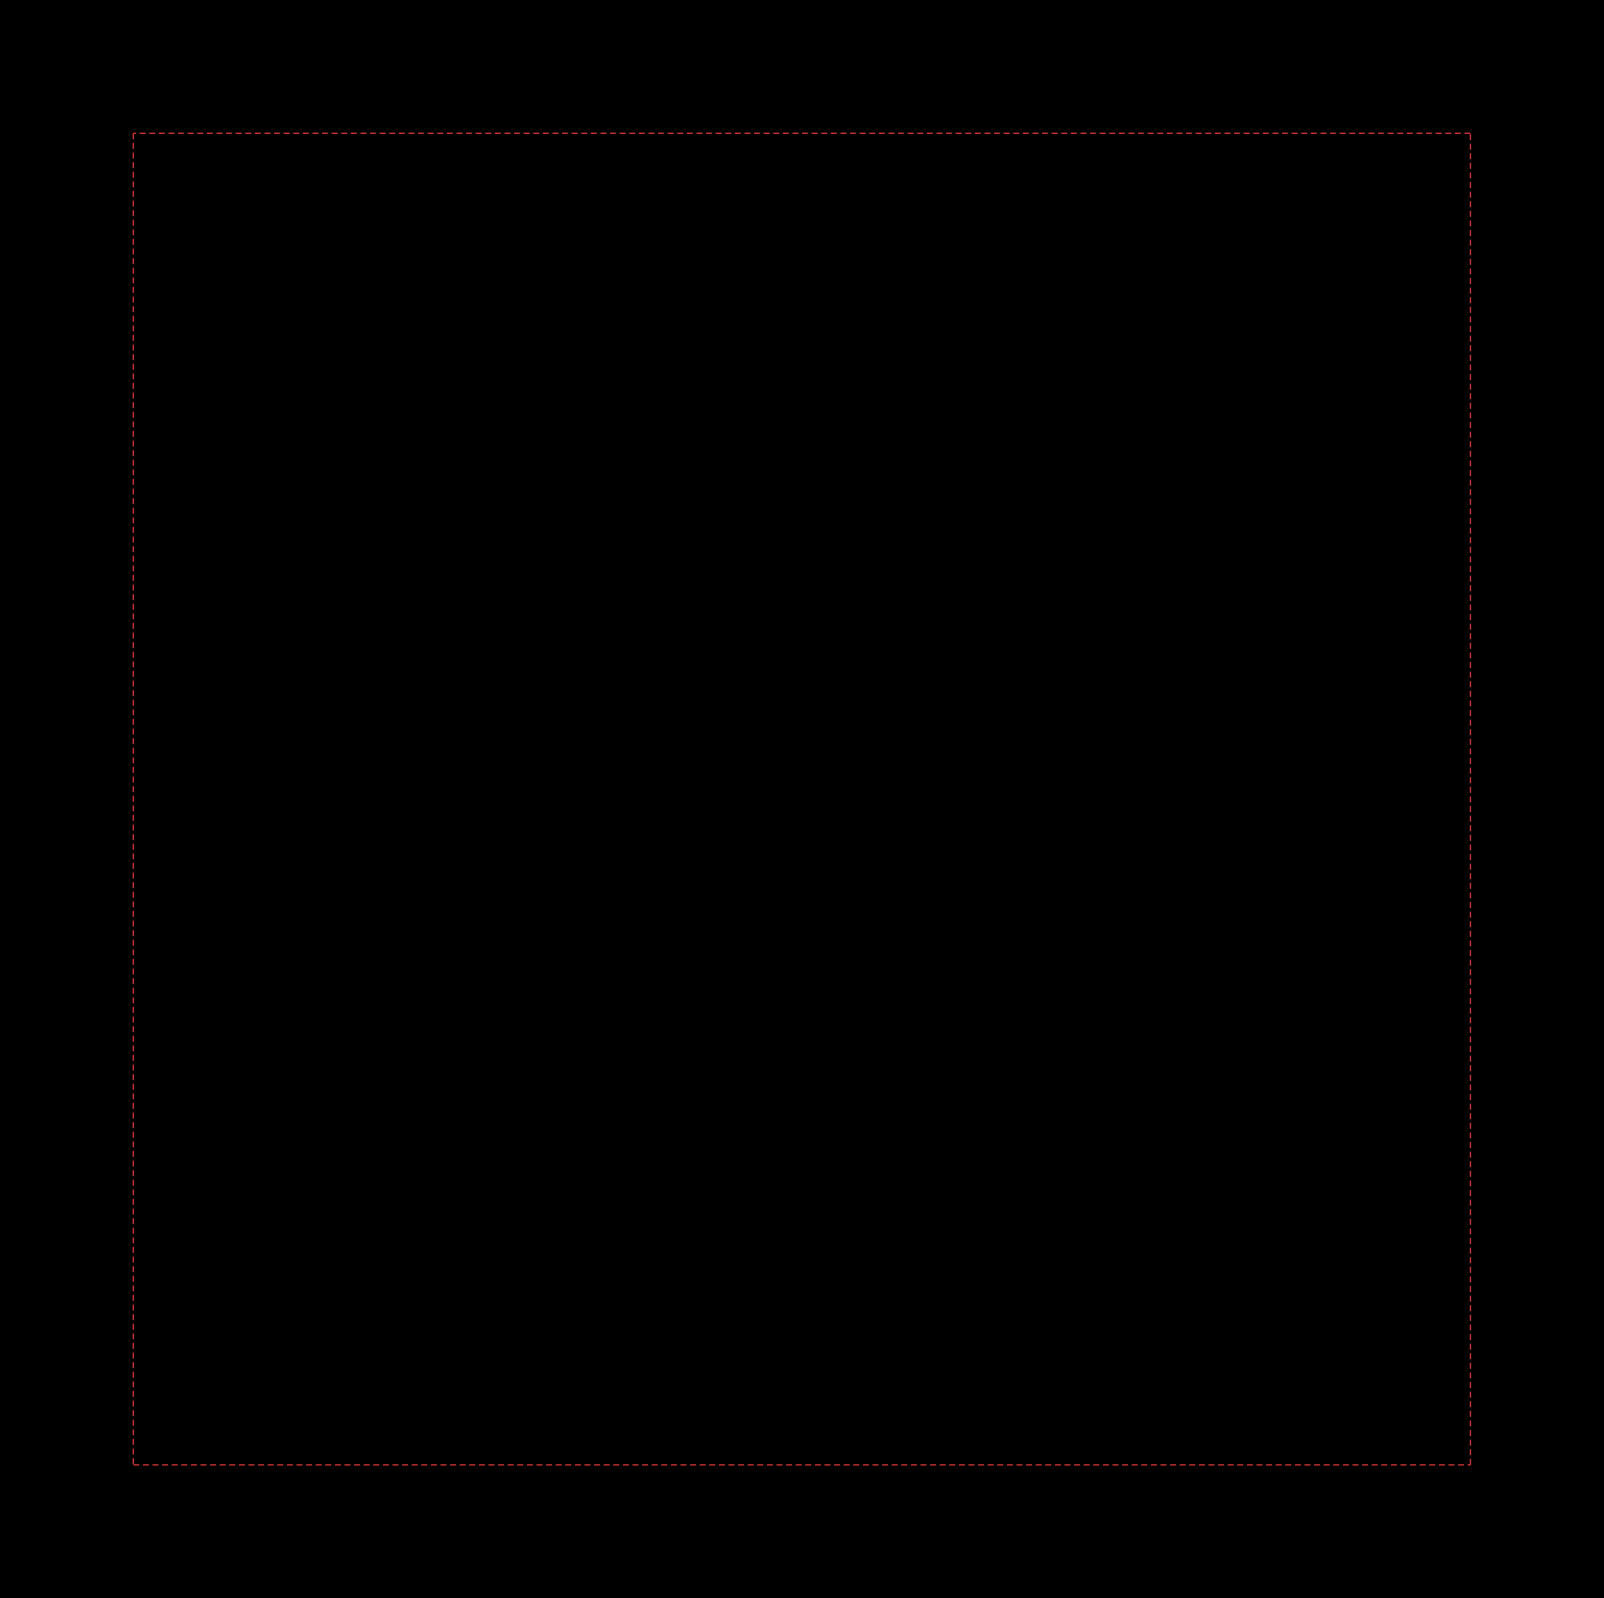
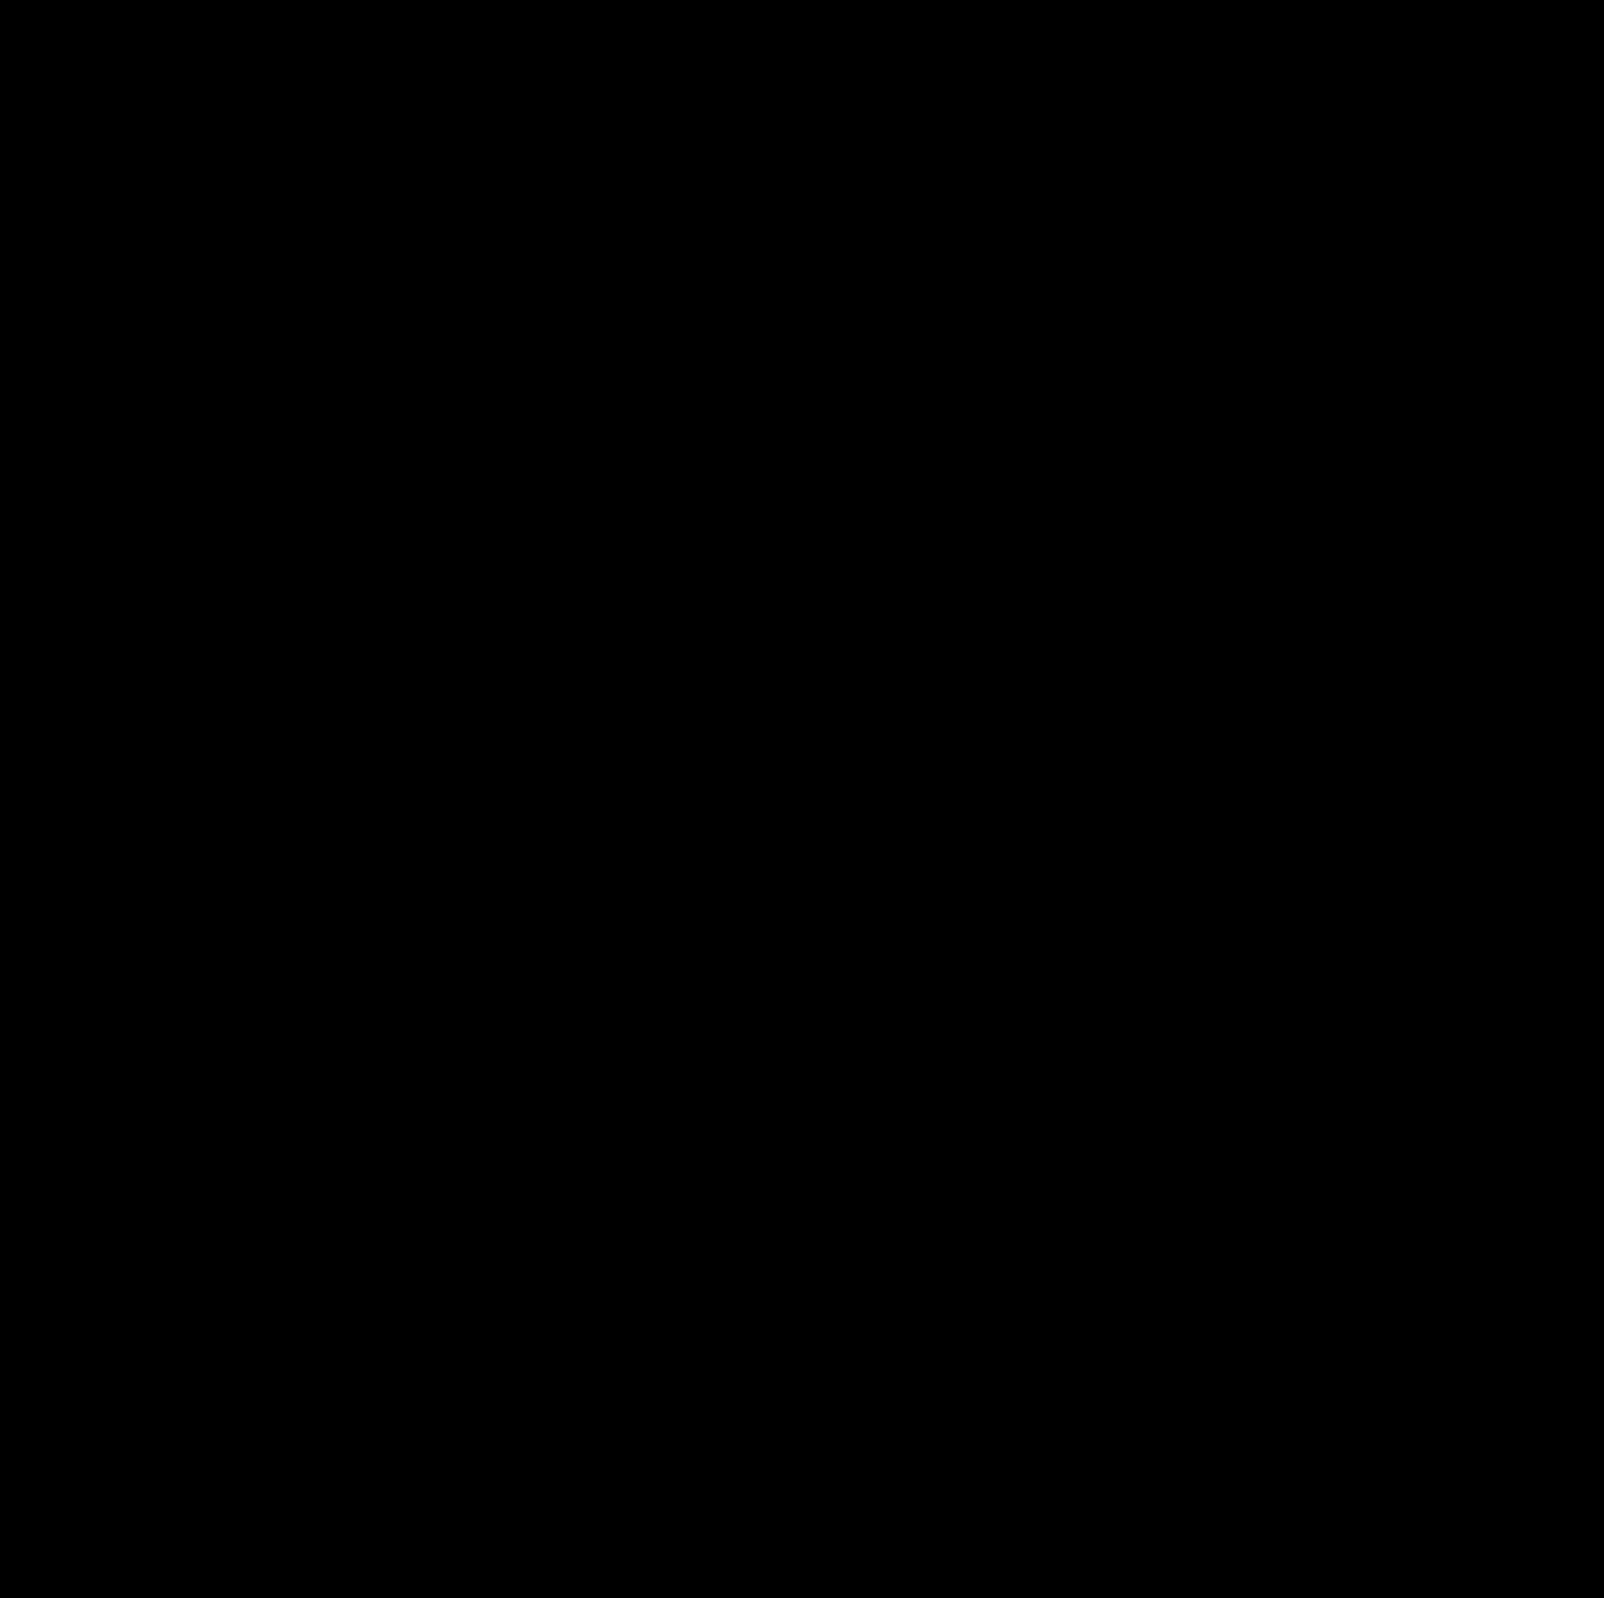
zone outline: (133, 133) (133, 1464) (1470, 1464) (1470, 133) (133, 133) -> none

